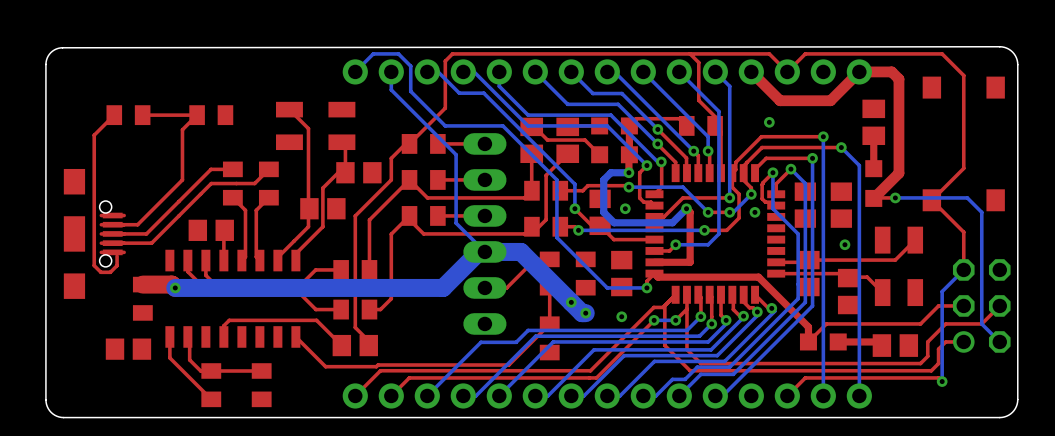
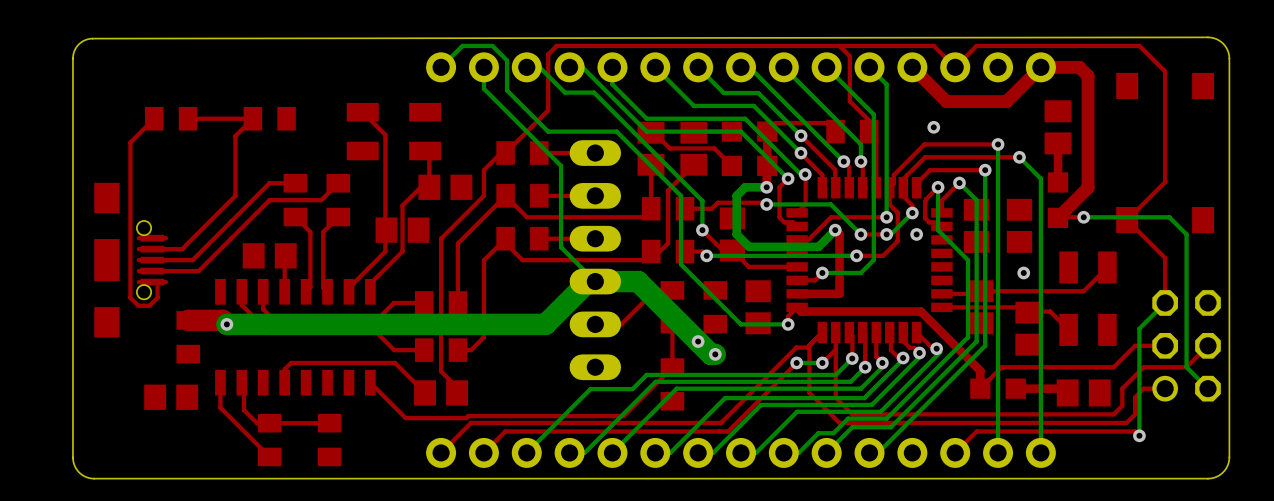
via: (625, 208) -> none
via: (621, 316) -> none

